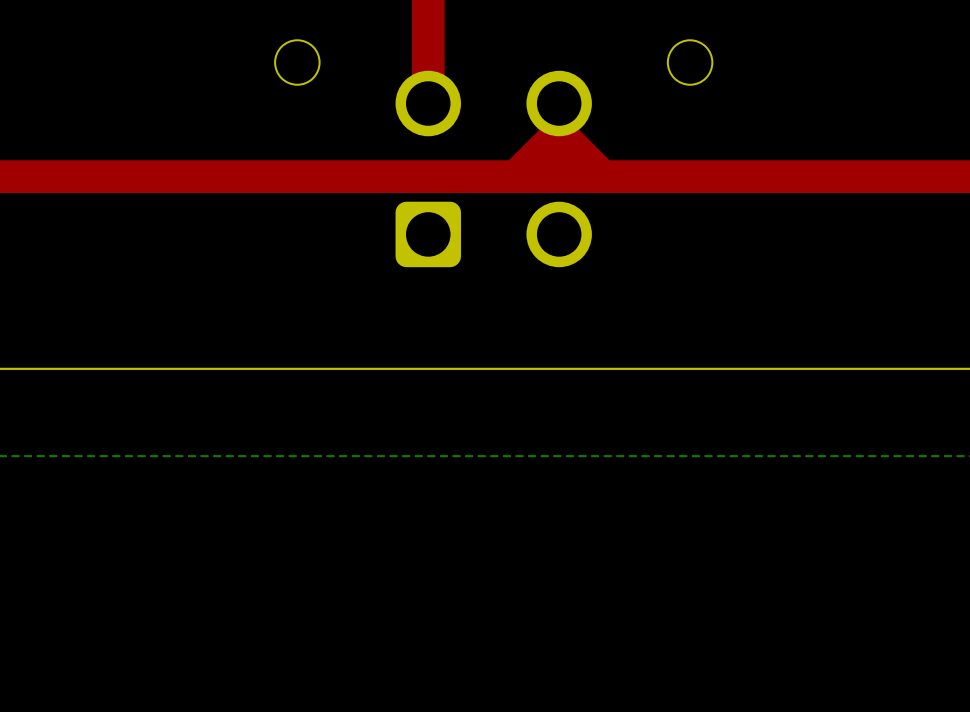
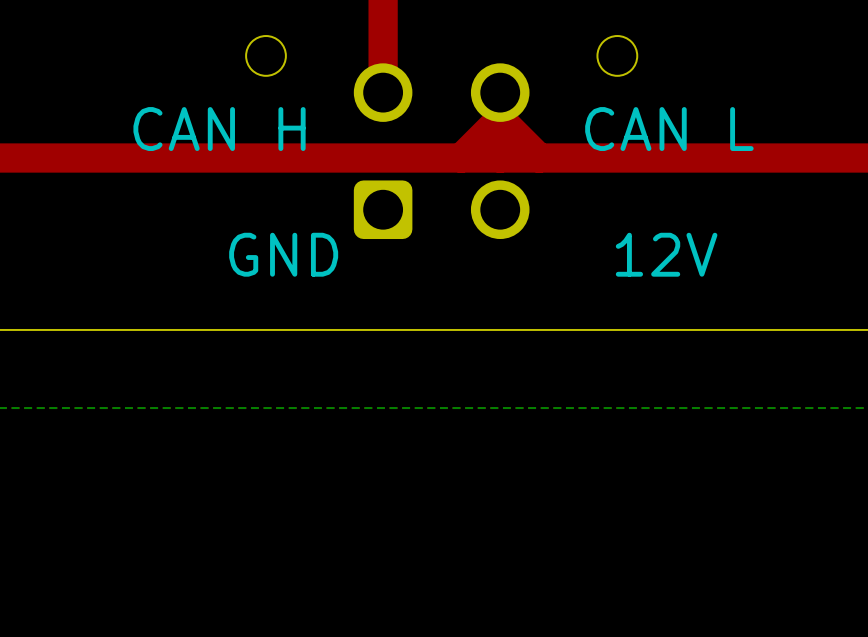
text: none -> CAN H CAN L (443, 129)
text: none -> GND 12V (473, 254)

